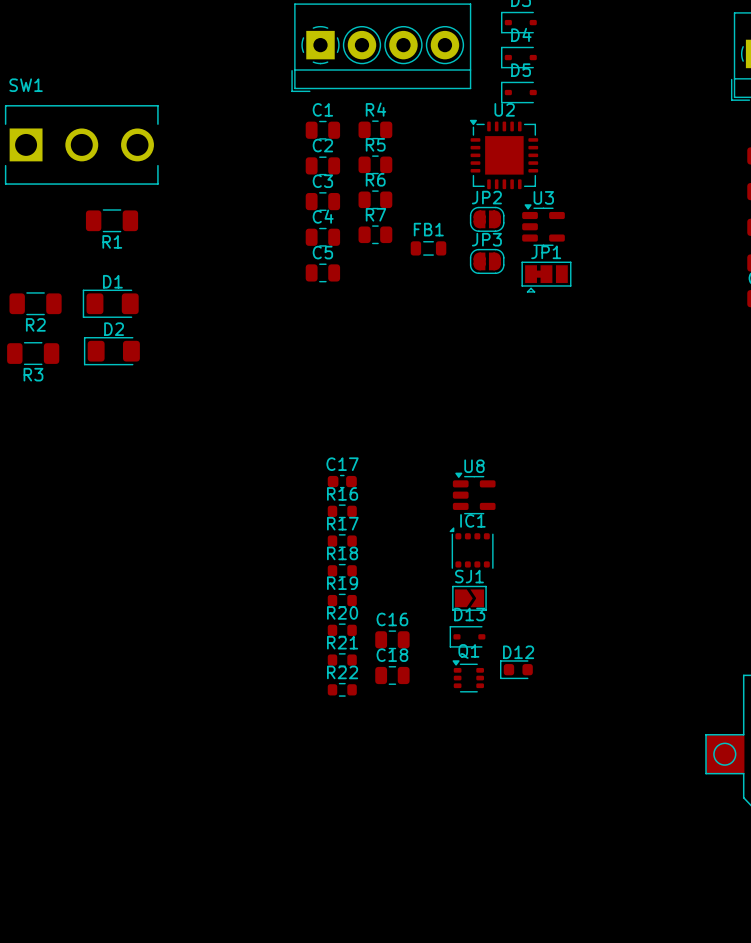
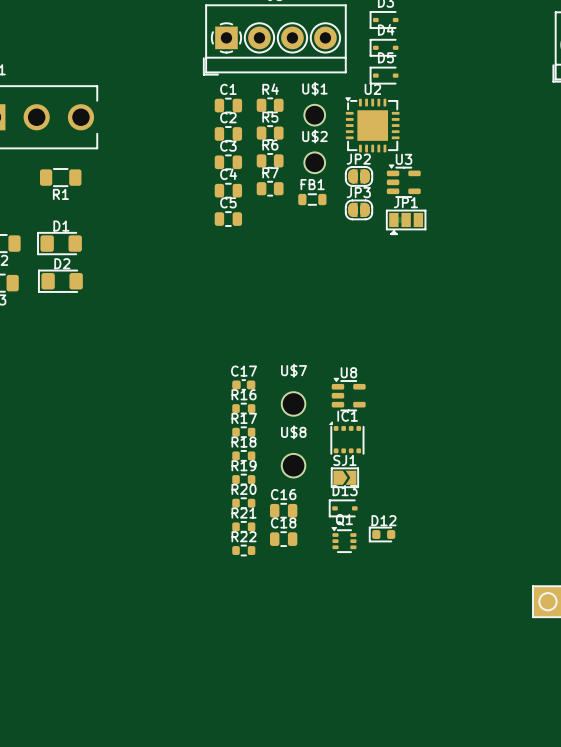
U$1: none -> (314, 115)
U$2: none -> (314, 162)
U$7: none -> (293, 403)
U$8: none -> (293, 465)

